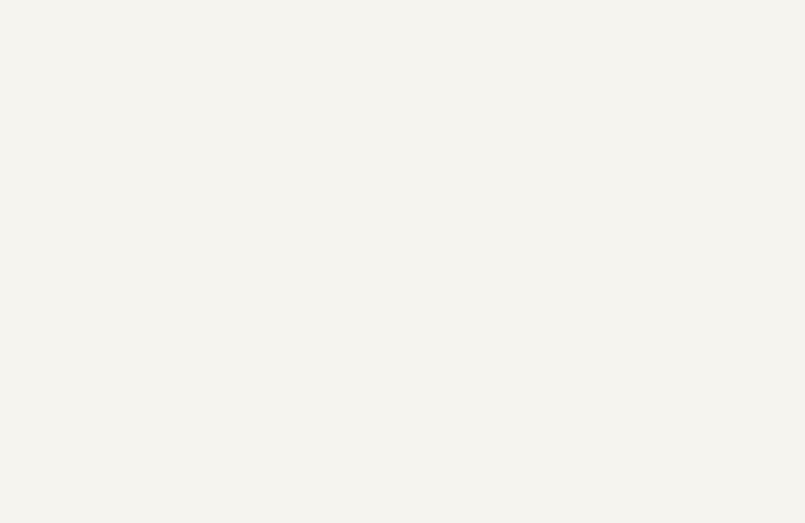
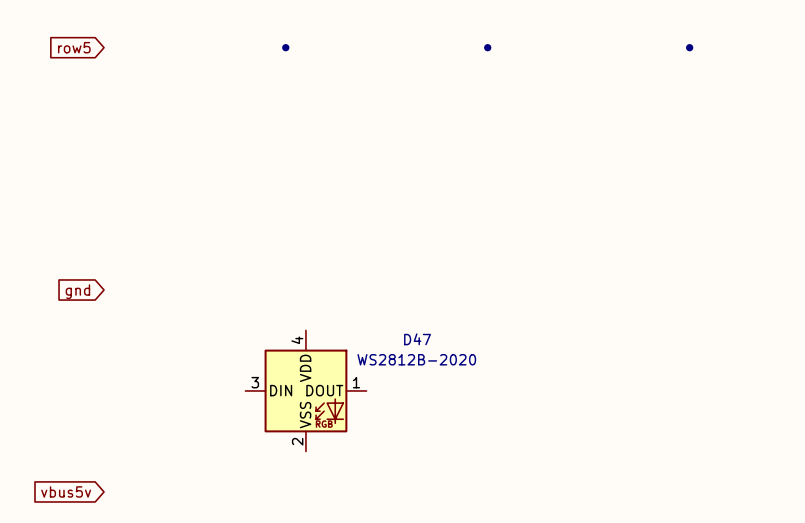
global label: none -> row5 (74, 47)
junction: none -> (285, 47)
junction: none -> (487, 47)
junction: none -> (689, 47)
global label: none -> gnd (77, 291)
D47: none -> WS2812B-2020 (305, 390)
global label: none -> vbus5v (66, 491)

